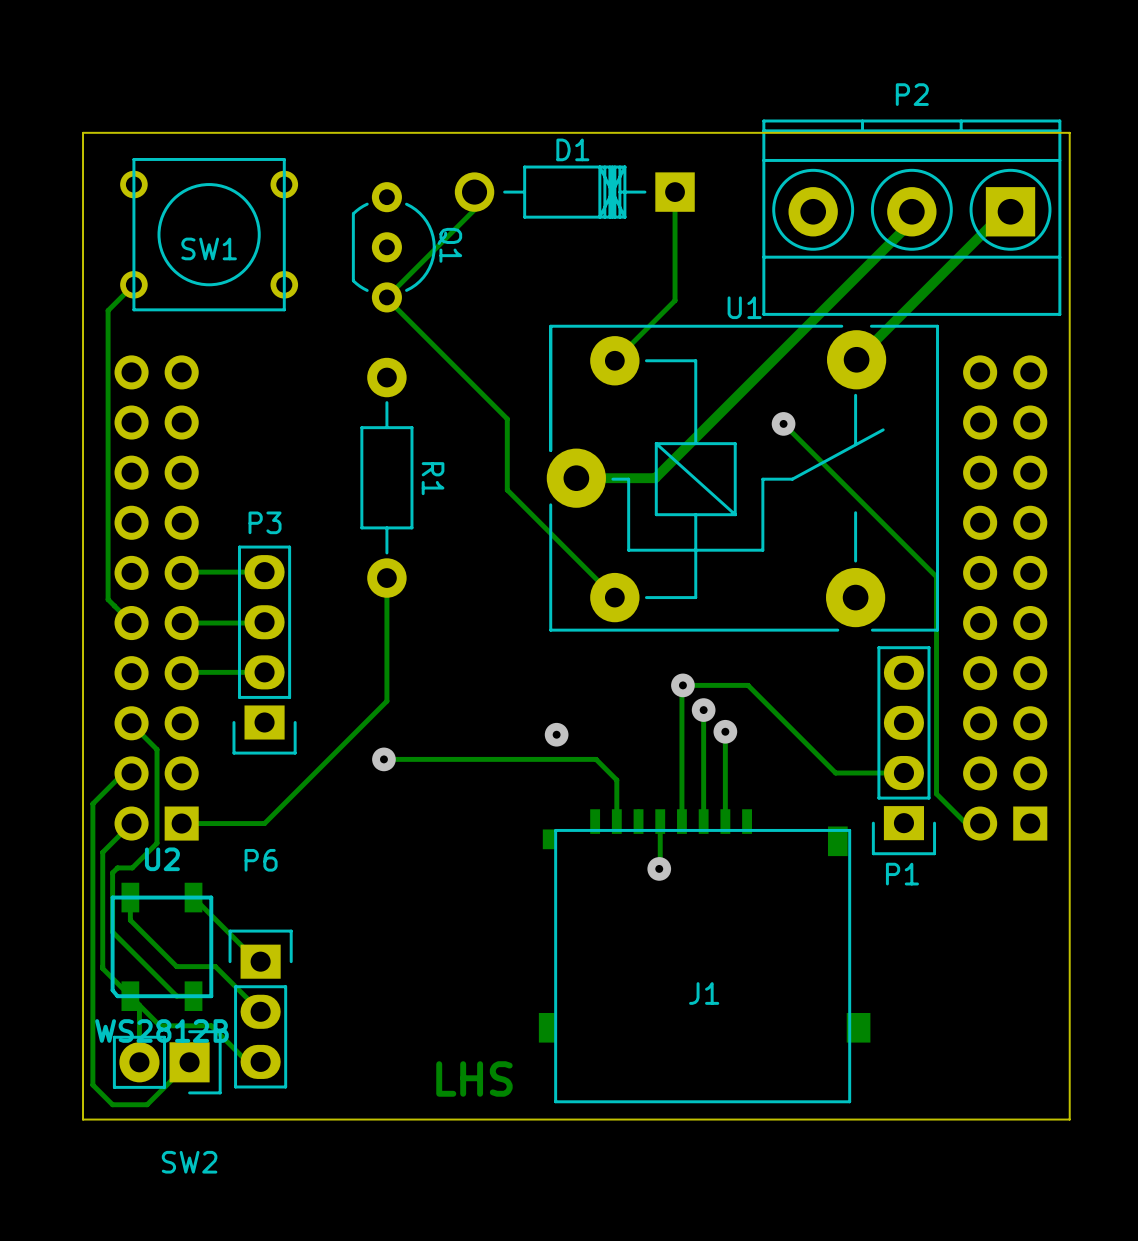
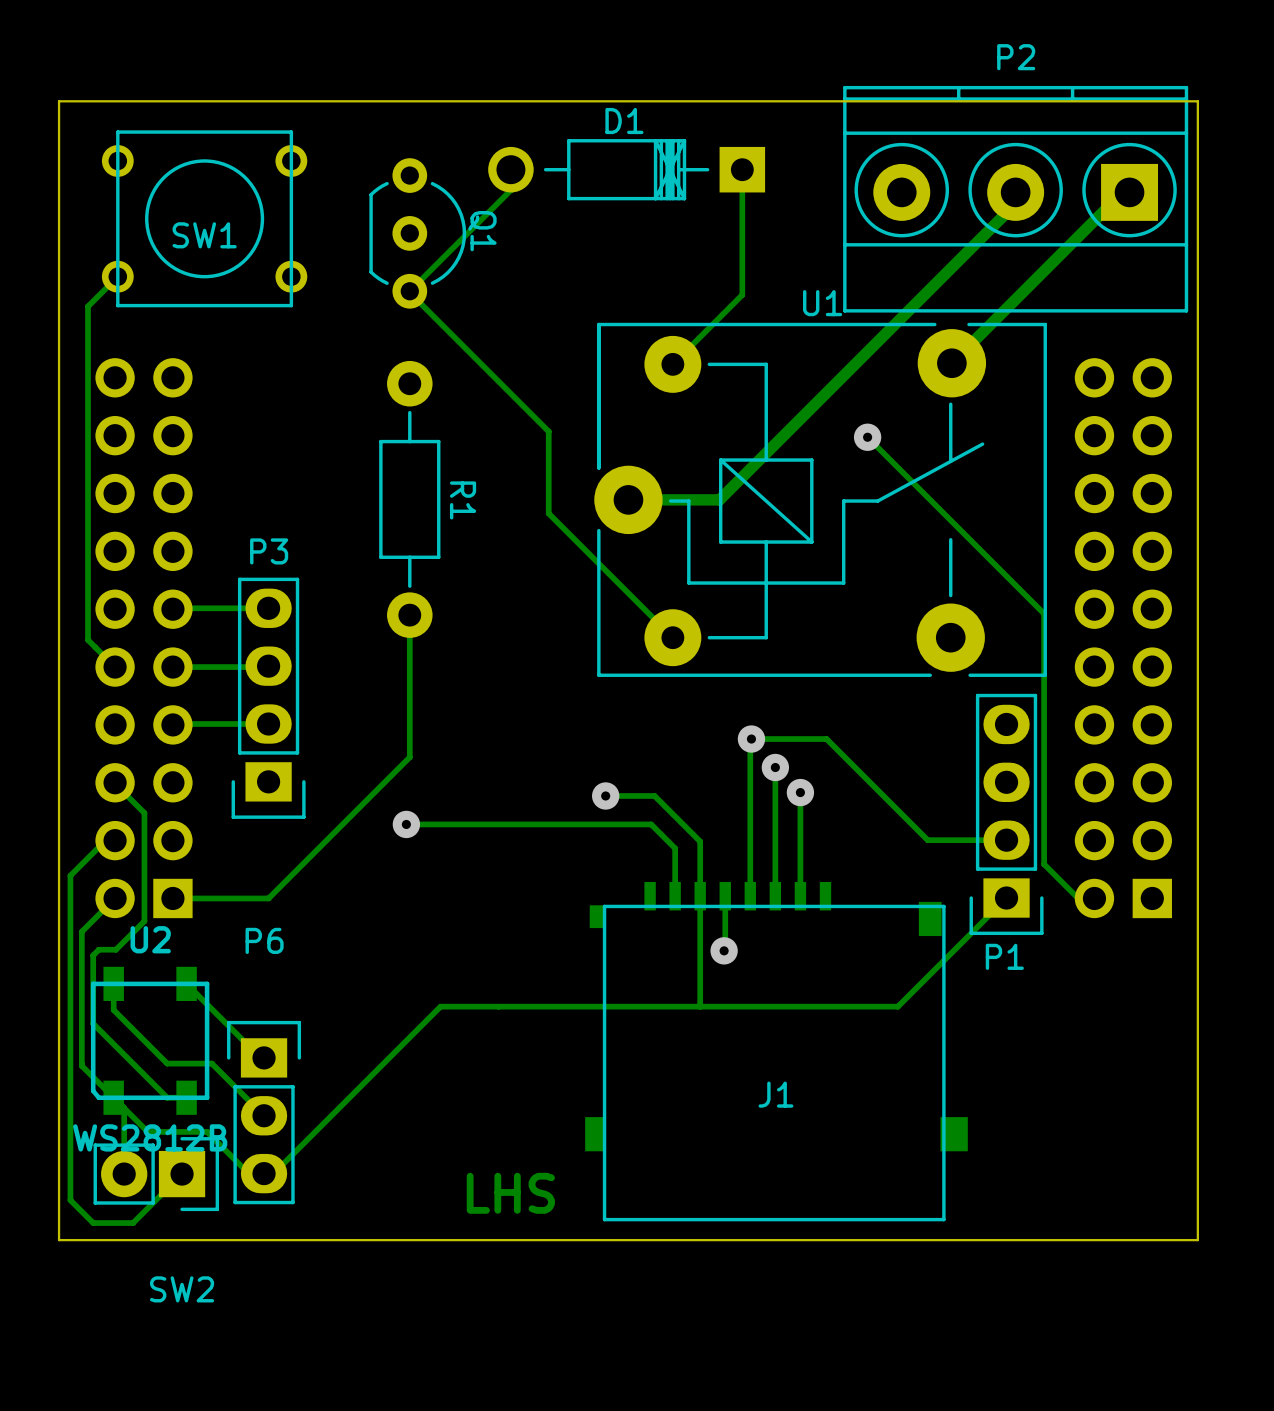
track: none -> (605, 795) (654, 795) (700, 841) (700, 884)
track: none -> (700, 896) (700, 1006)
track: none -> (1006, 898) (897, 1006) (440, 1006) (273, 1173)

